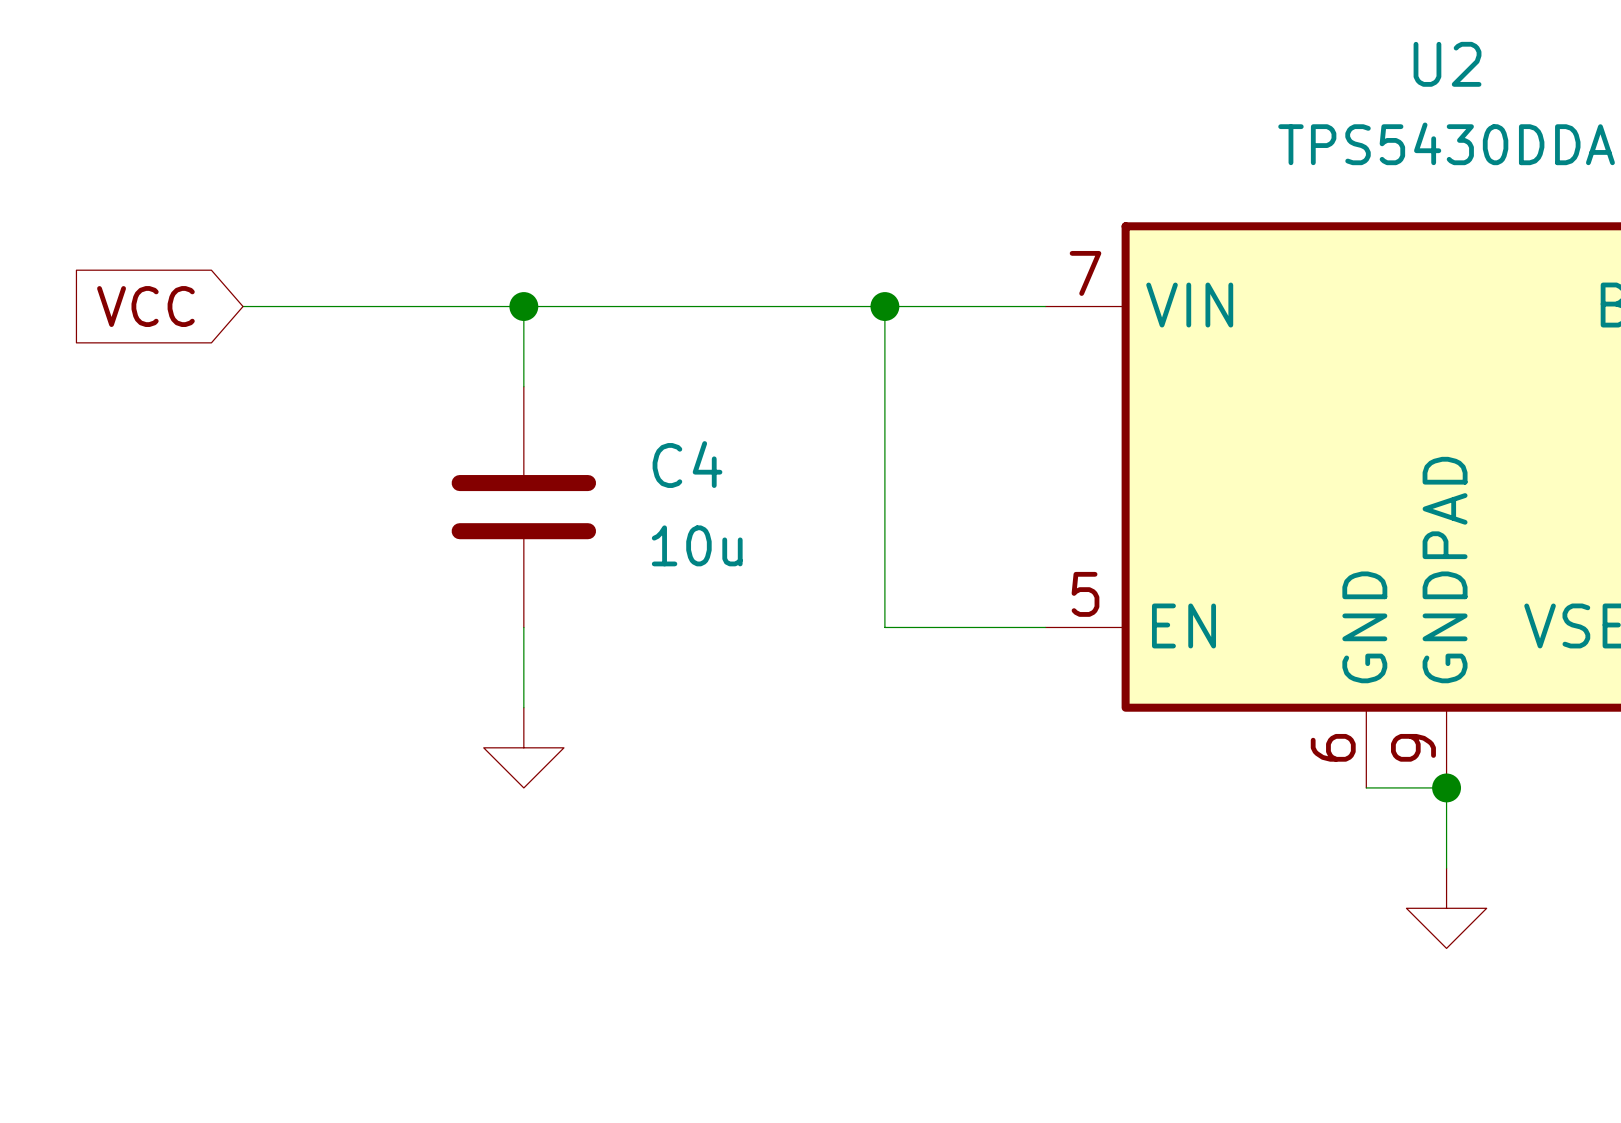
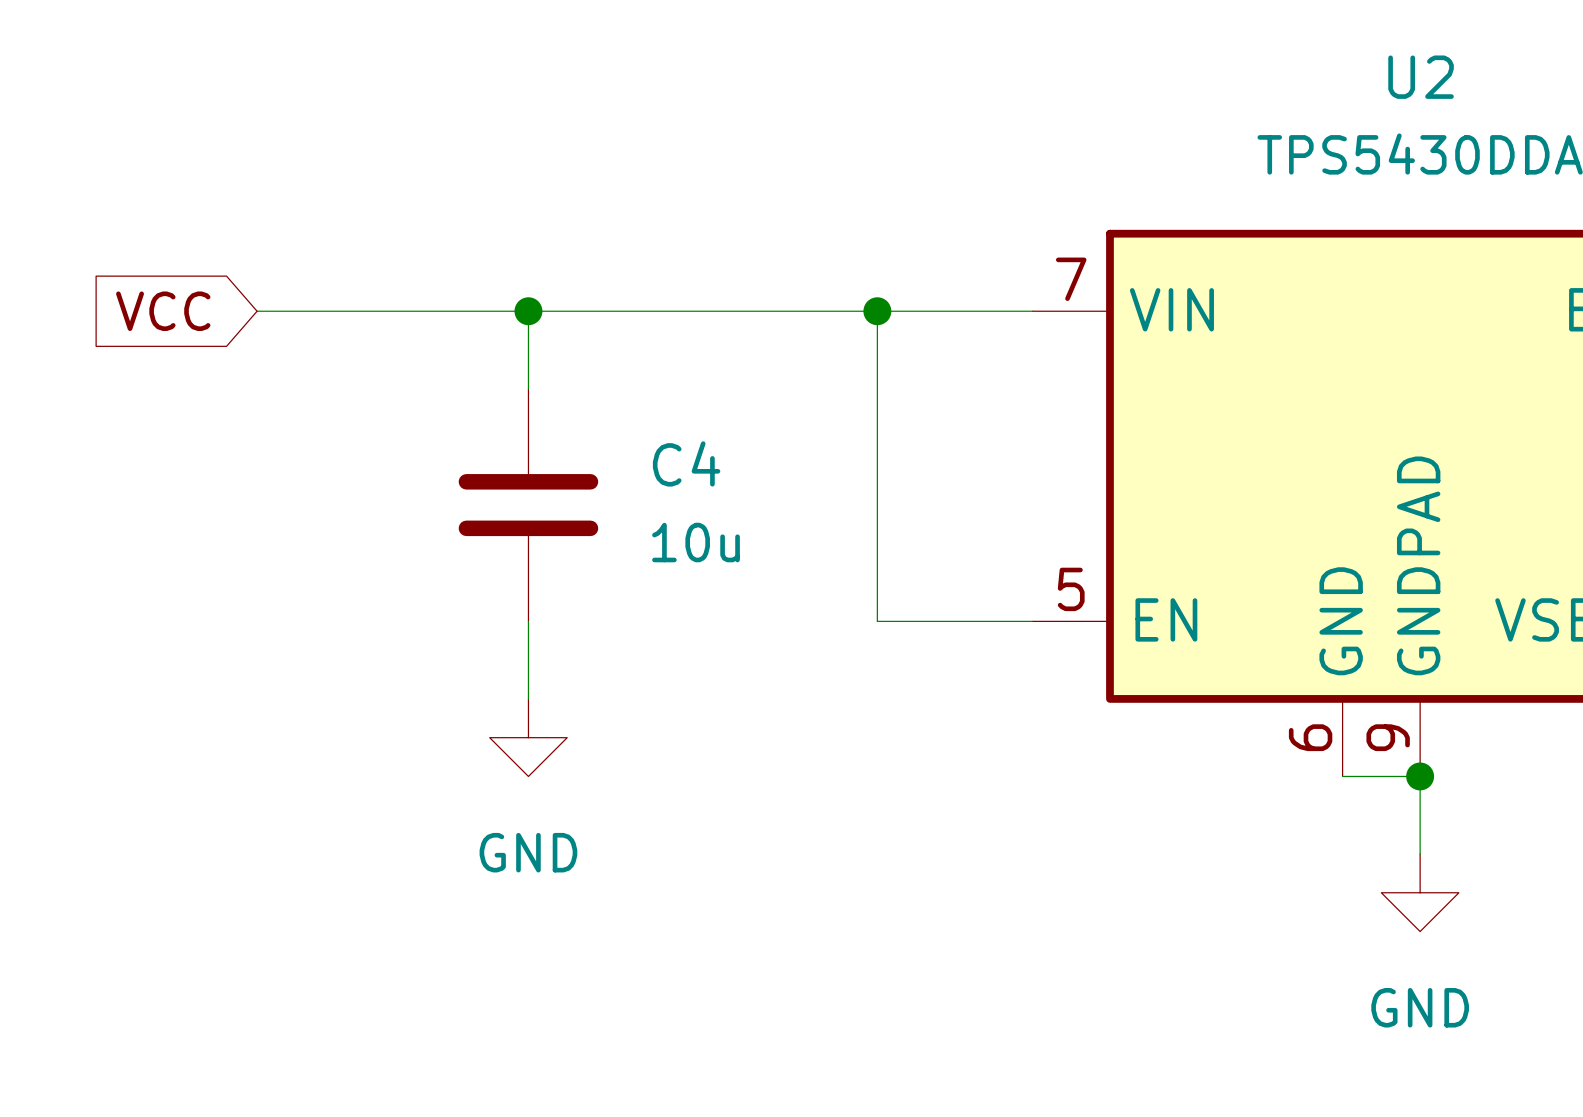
power symbol text: none -> GND (528, 852)
power symbol text: none -> GND (1420, 1007)

